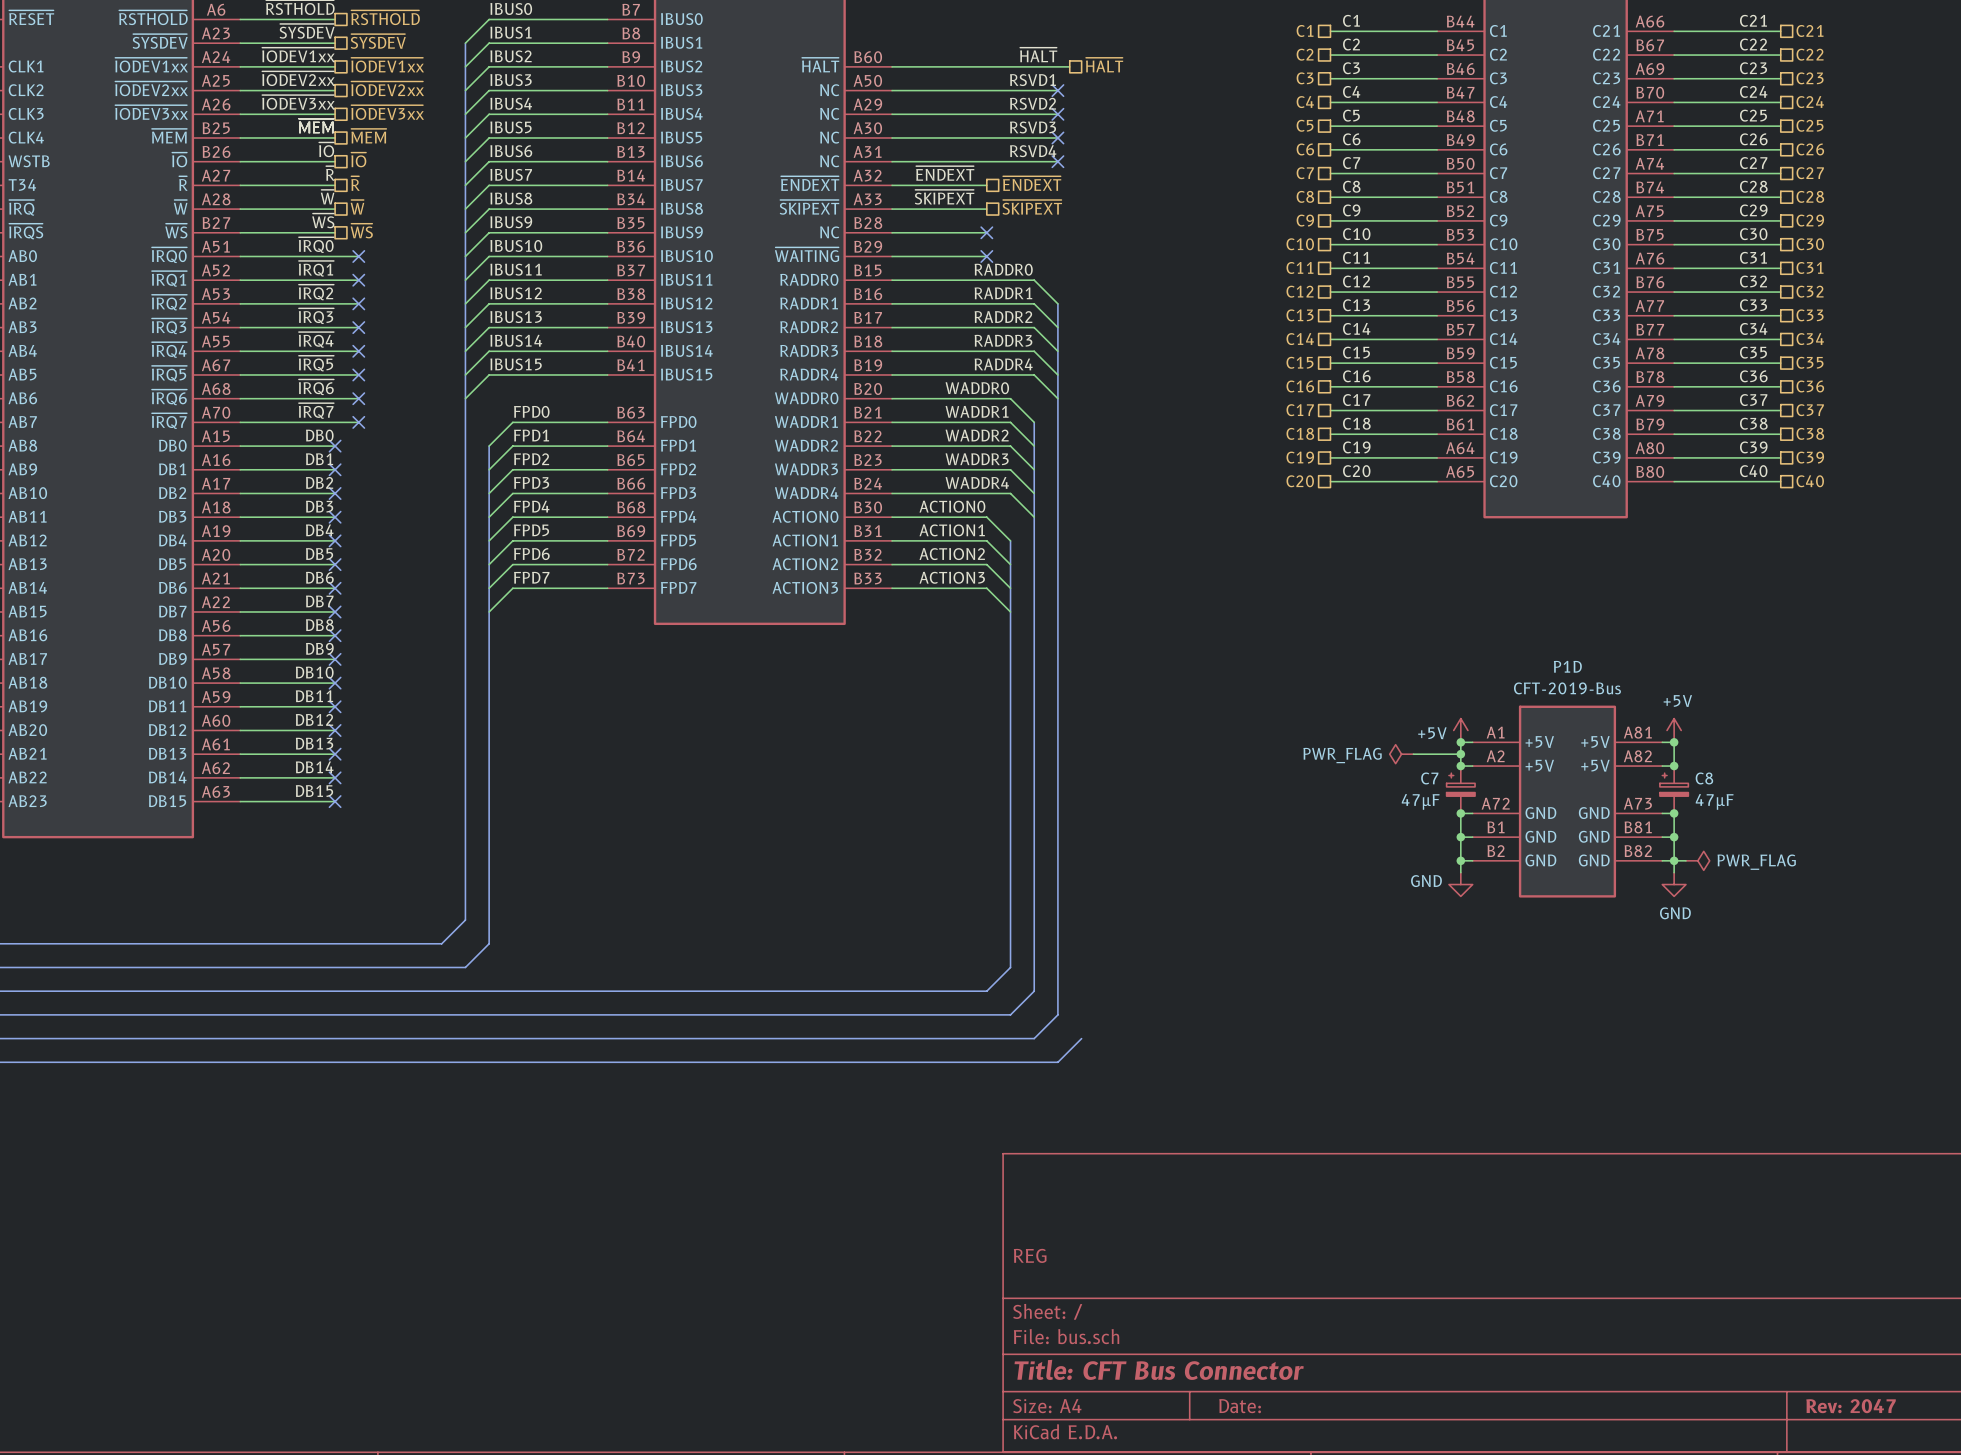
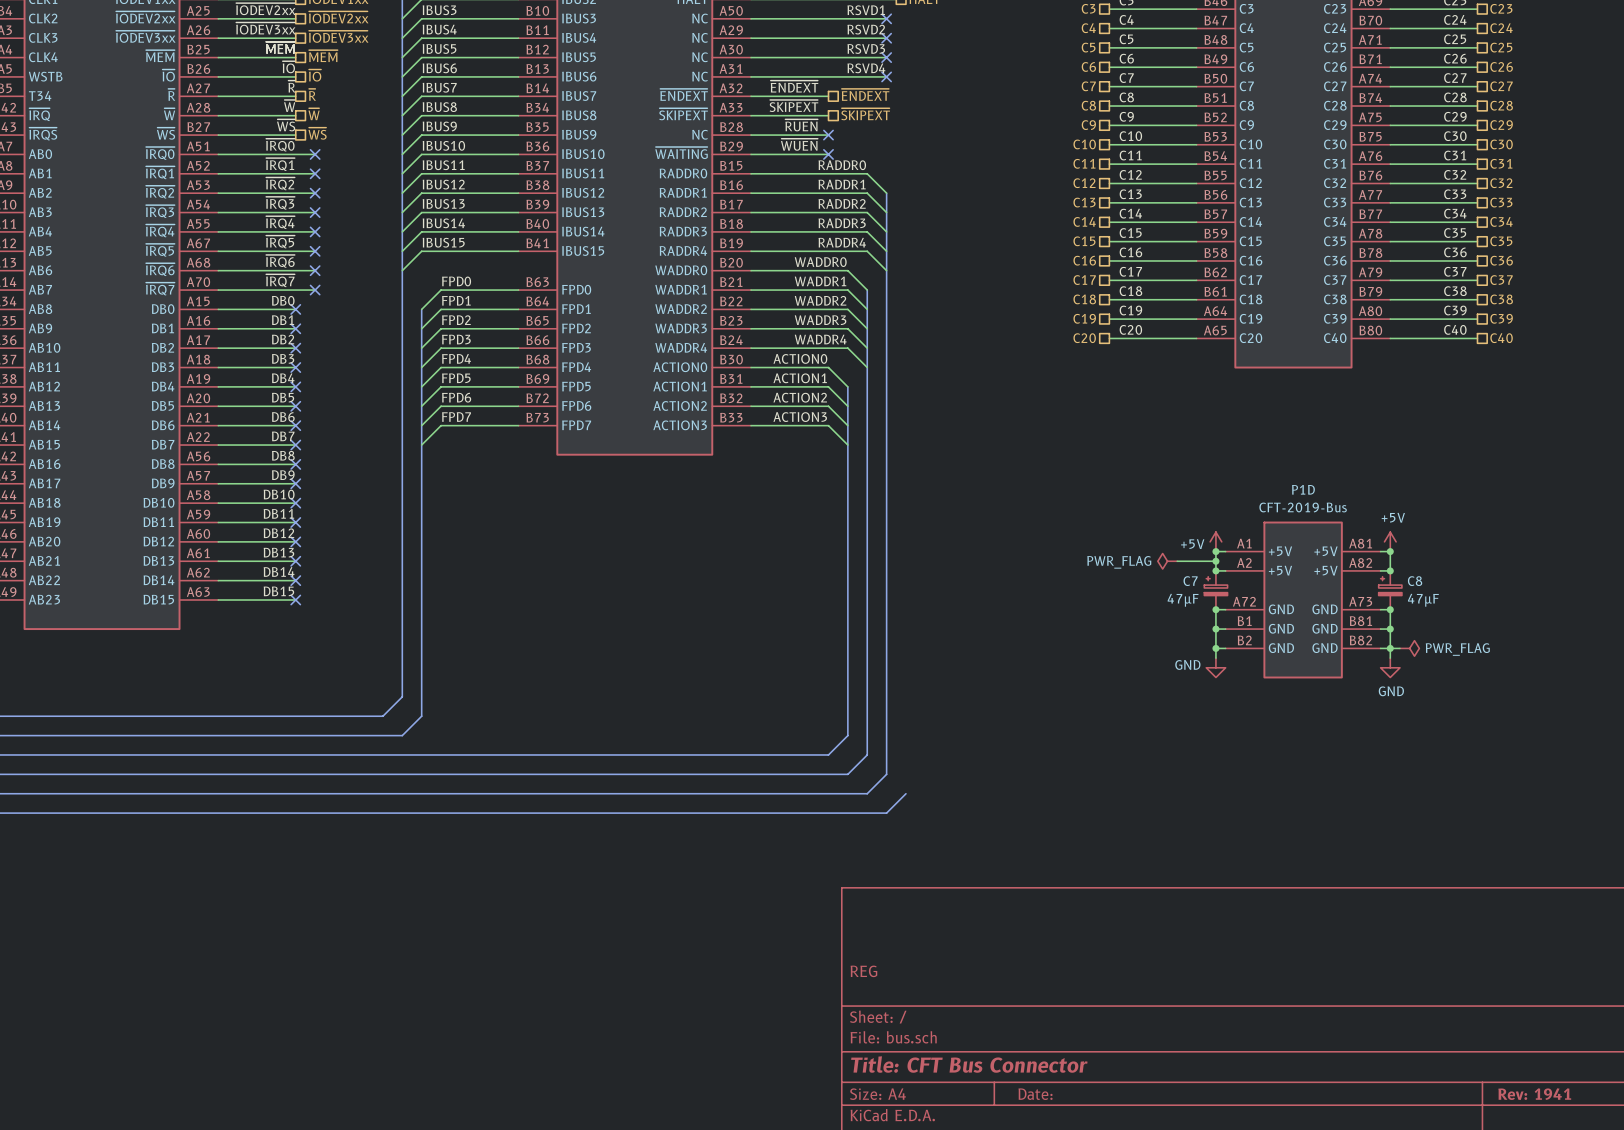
label: none -> ~{RUEN} (801, 125)
label: none -> ~{WUEN} (799, 144)
title block: Rev: 2047 (1851, 1406) -> Rev: 1941 (1534, 1094)

